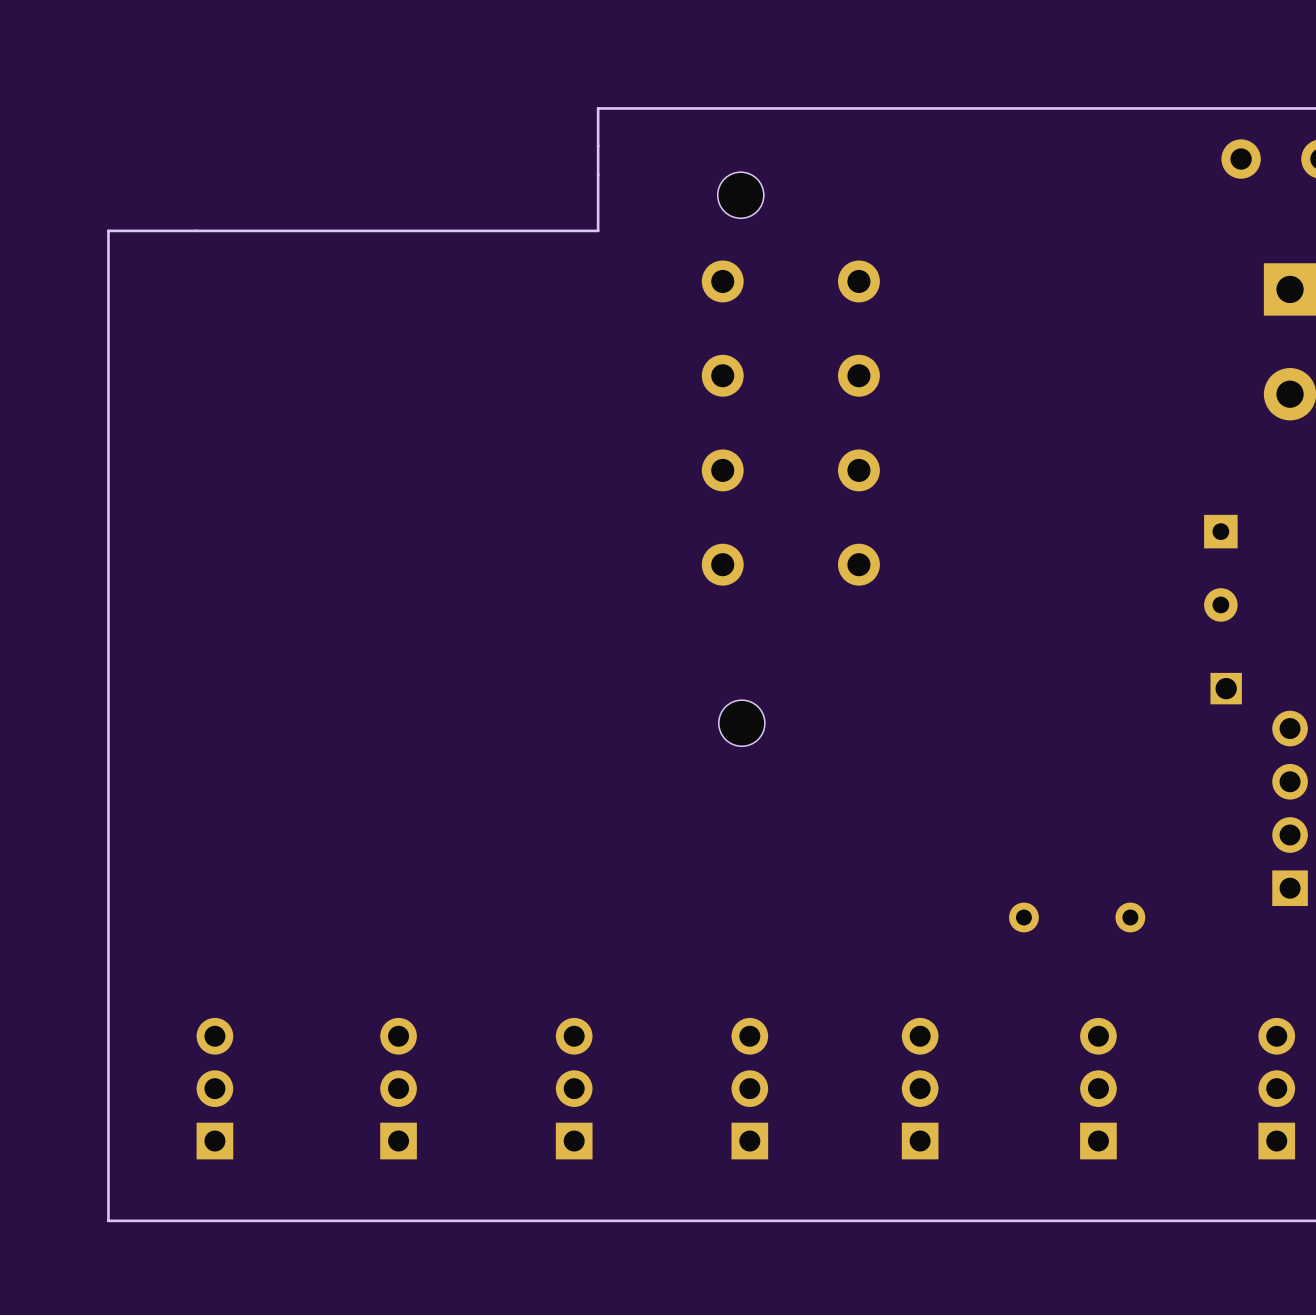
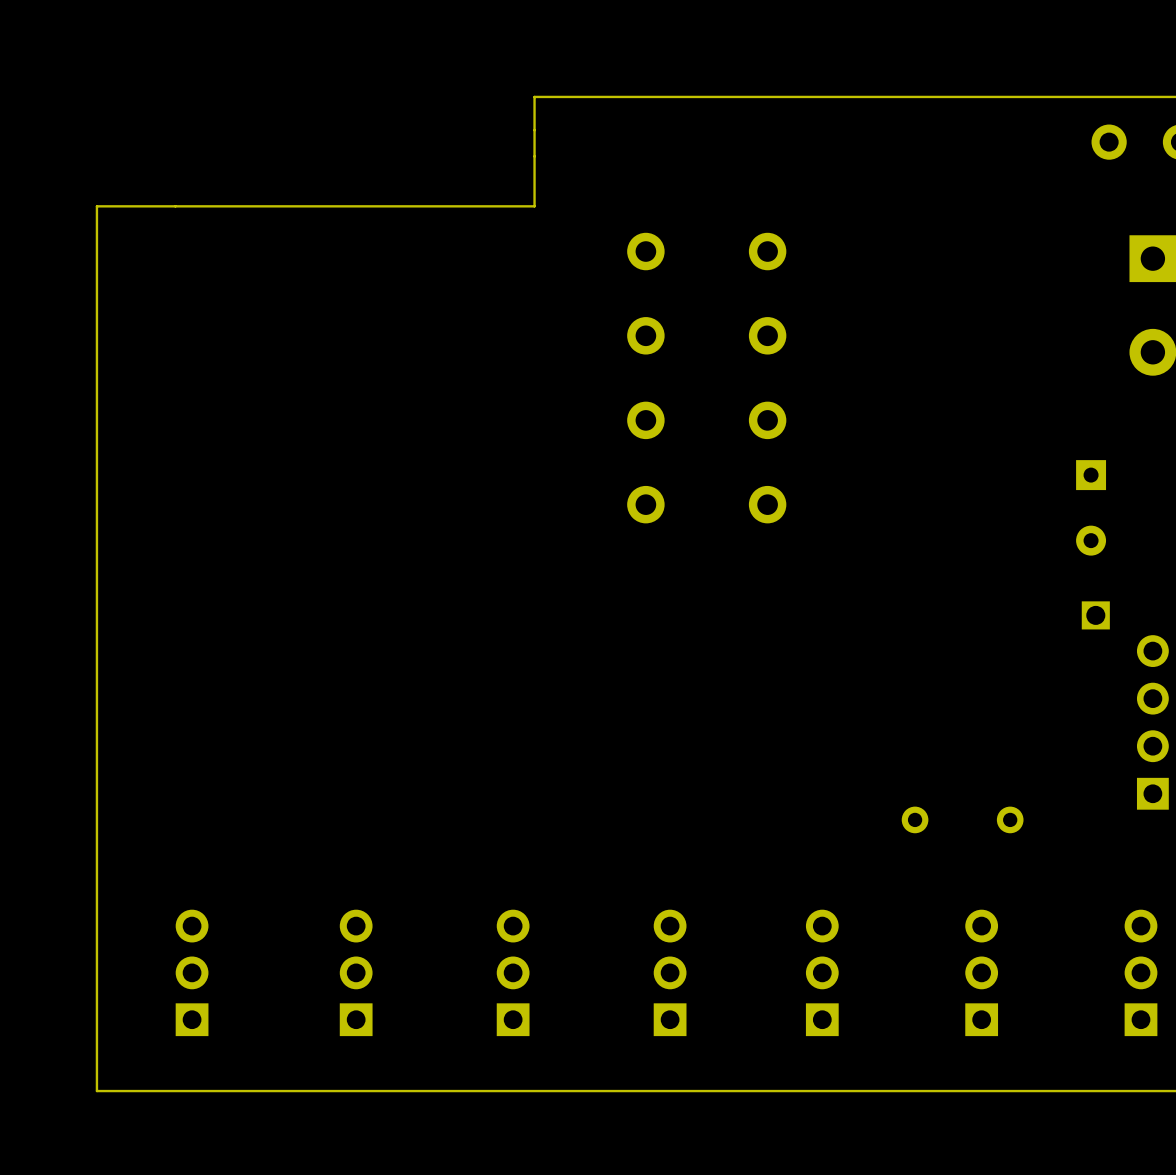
part: (740, 195) -> none
part: (741, 723) -> none

